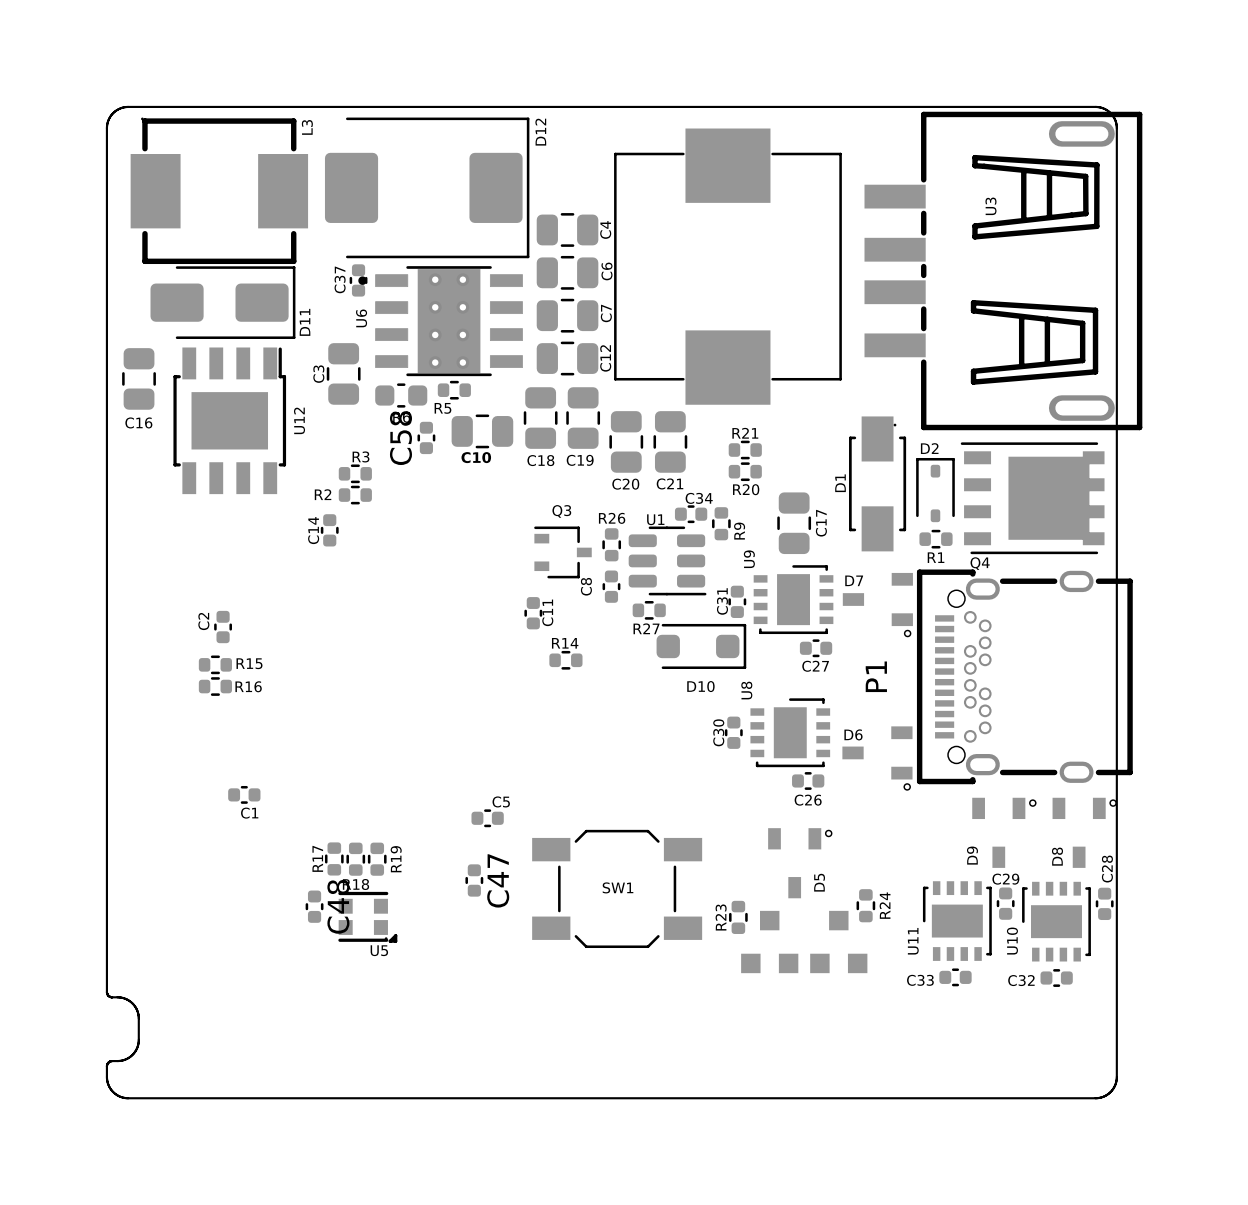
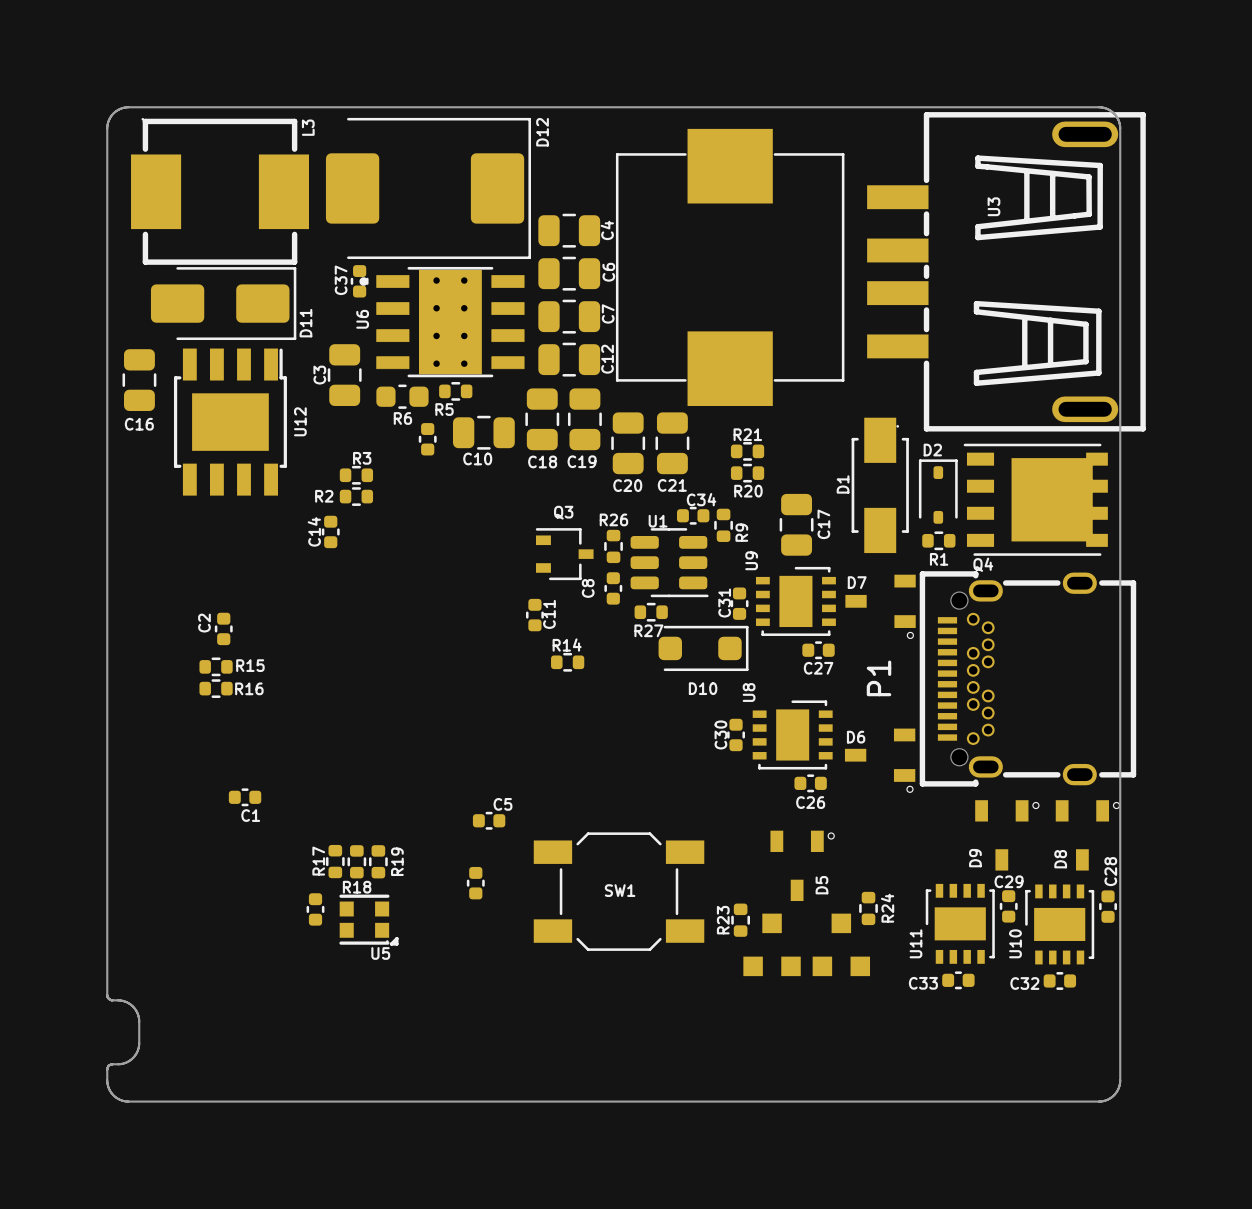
C58 name: C58 (400, 438) -> none
C47 name: C47 (498, 880) -> none
C48 name: C48 (338, 906) -> none

